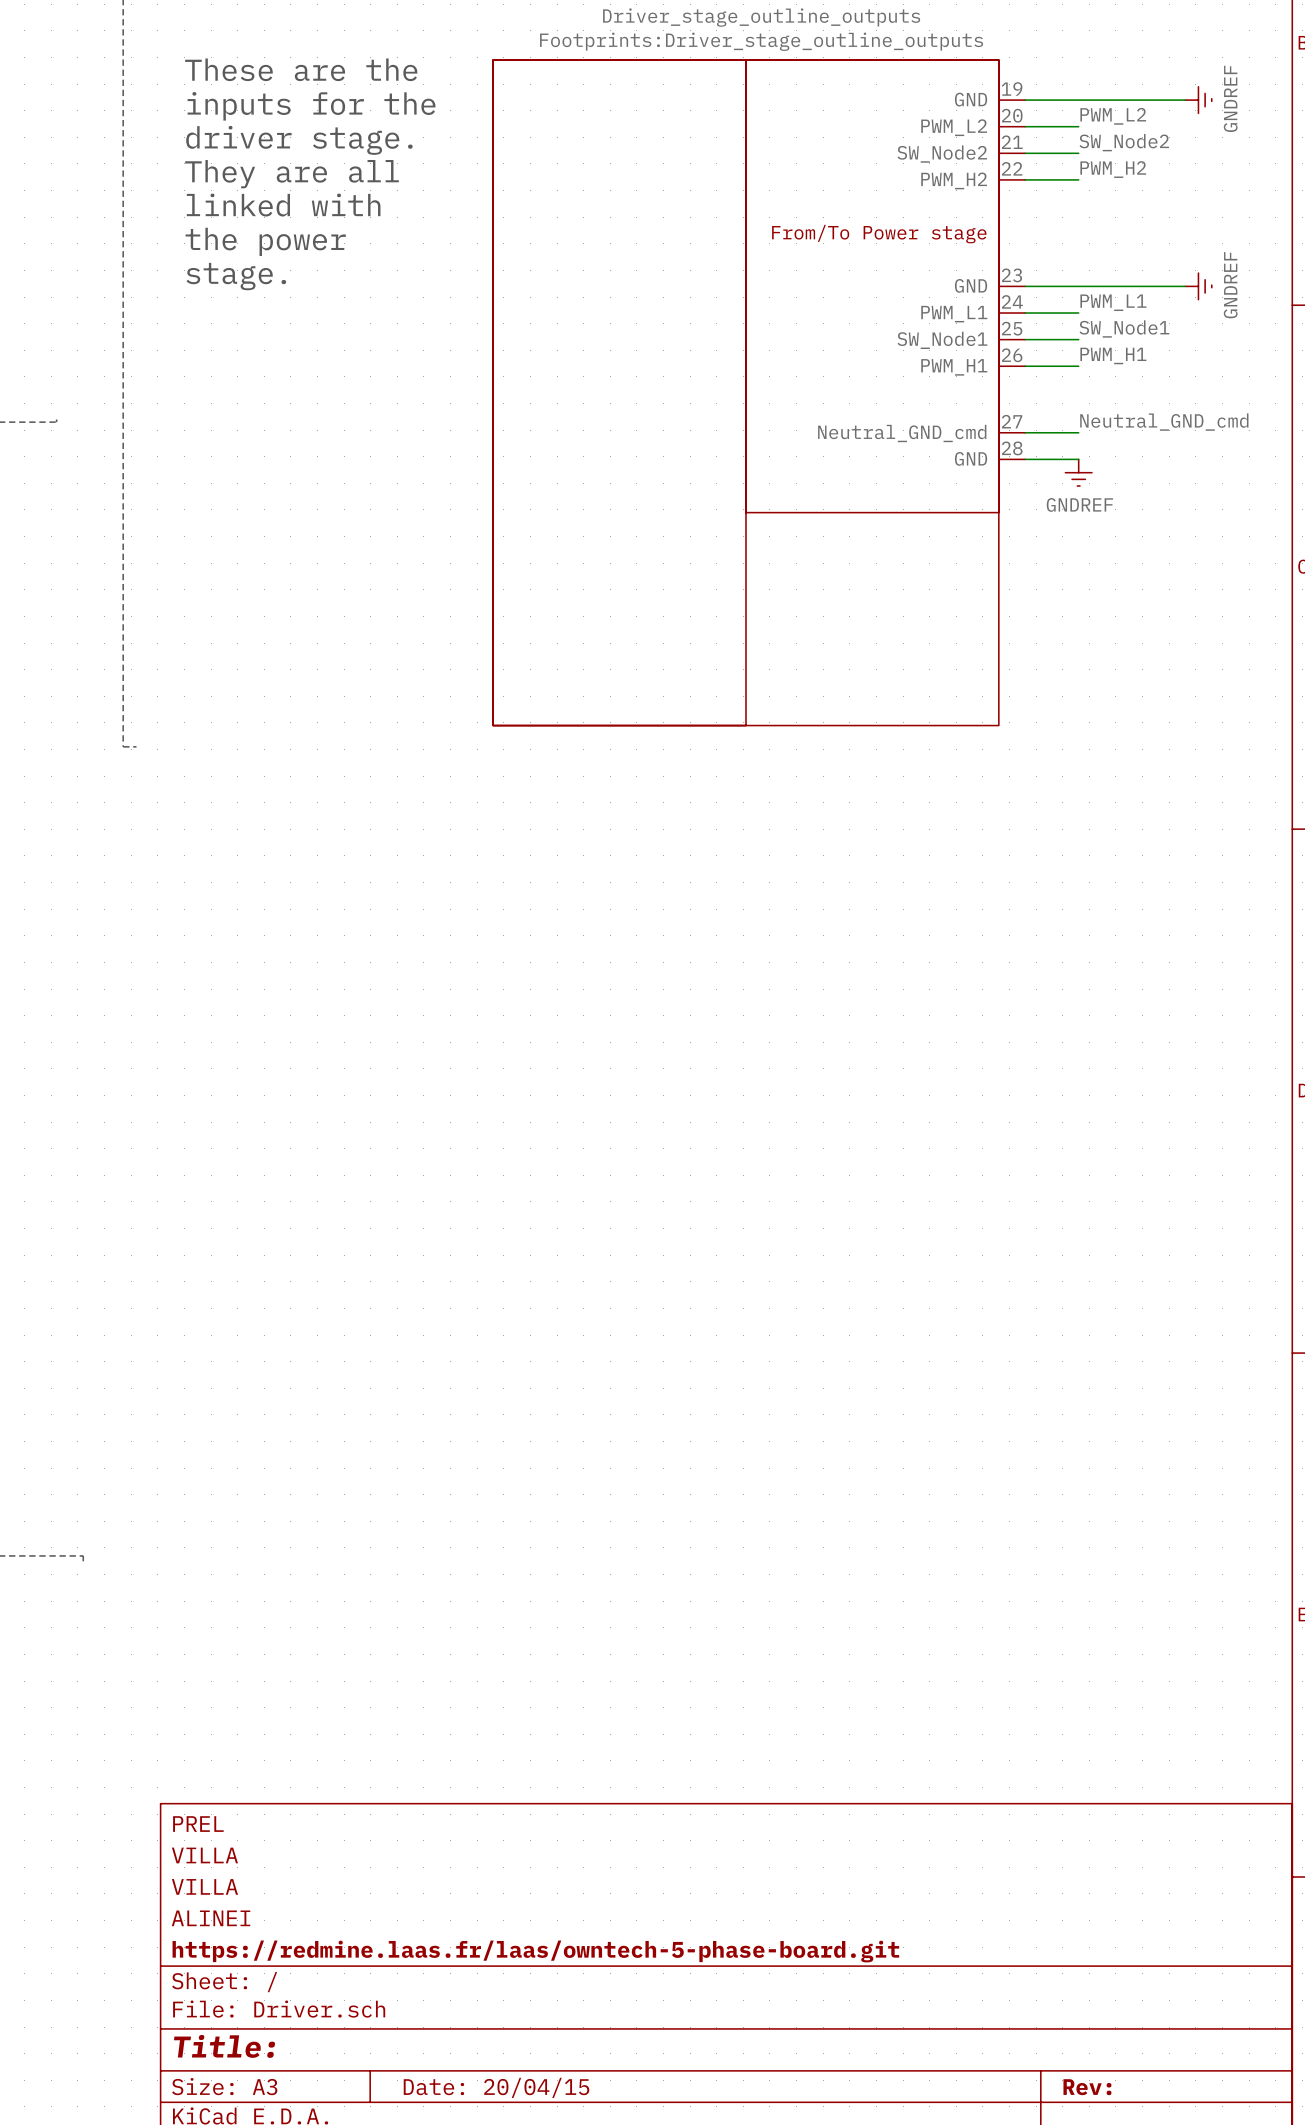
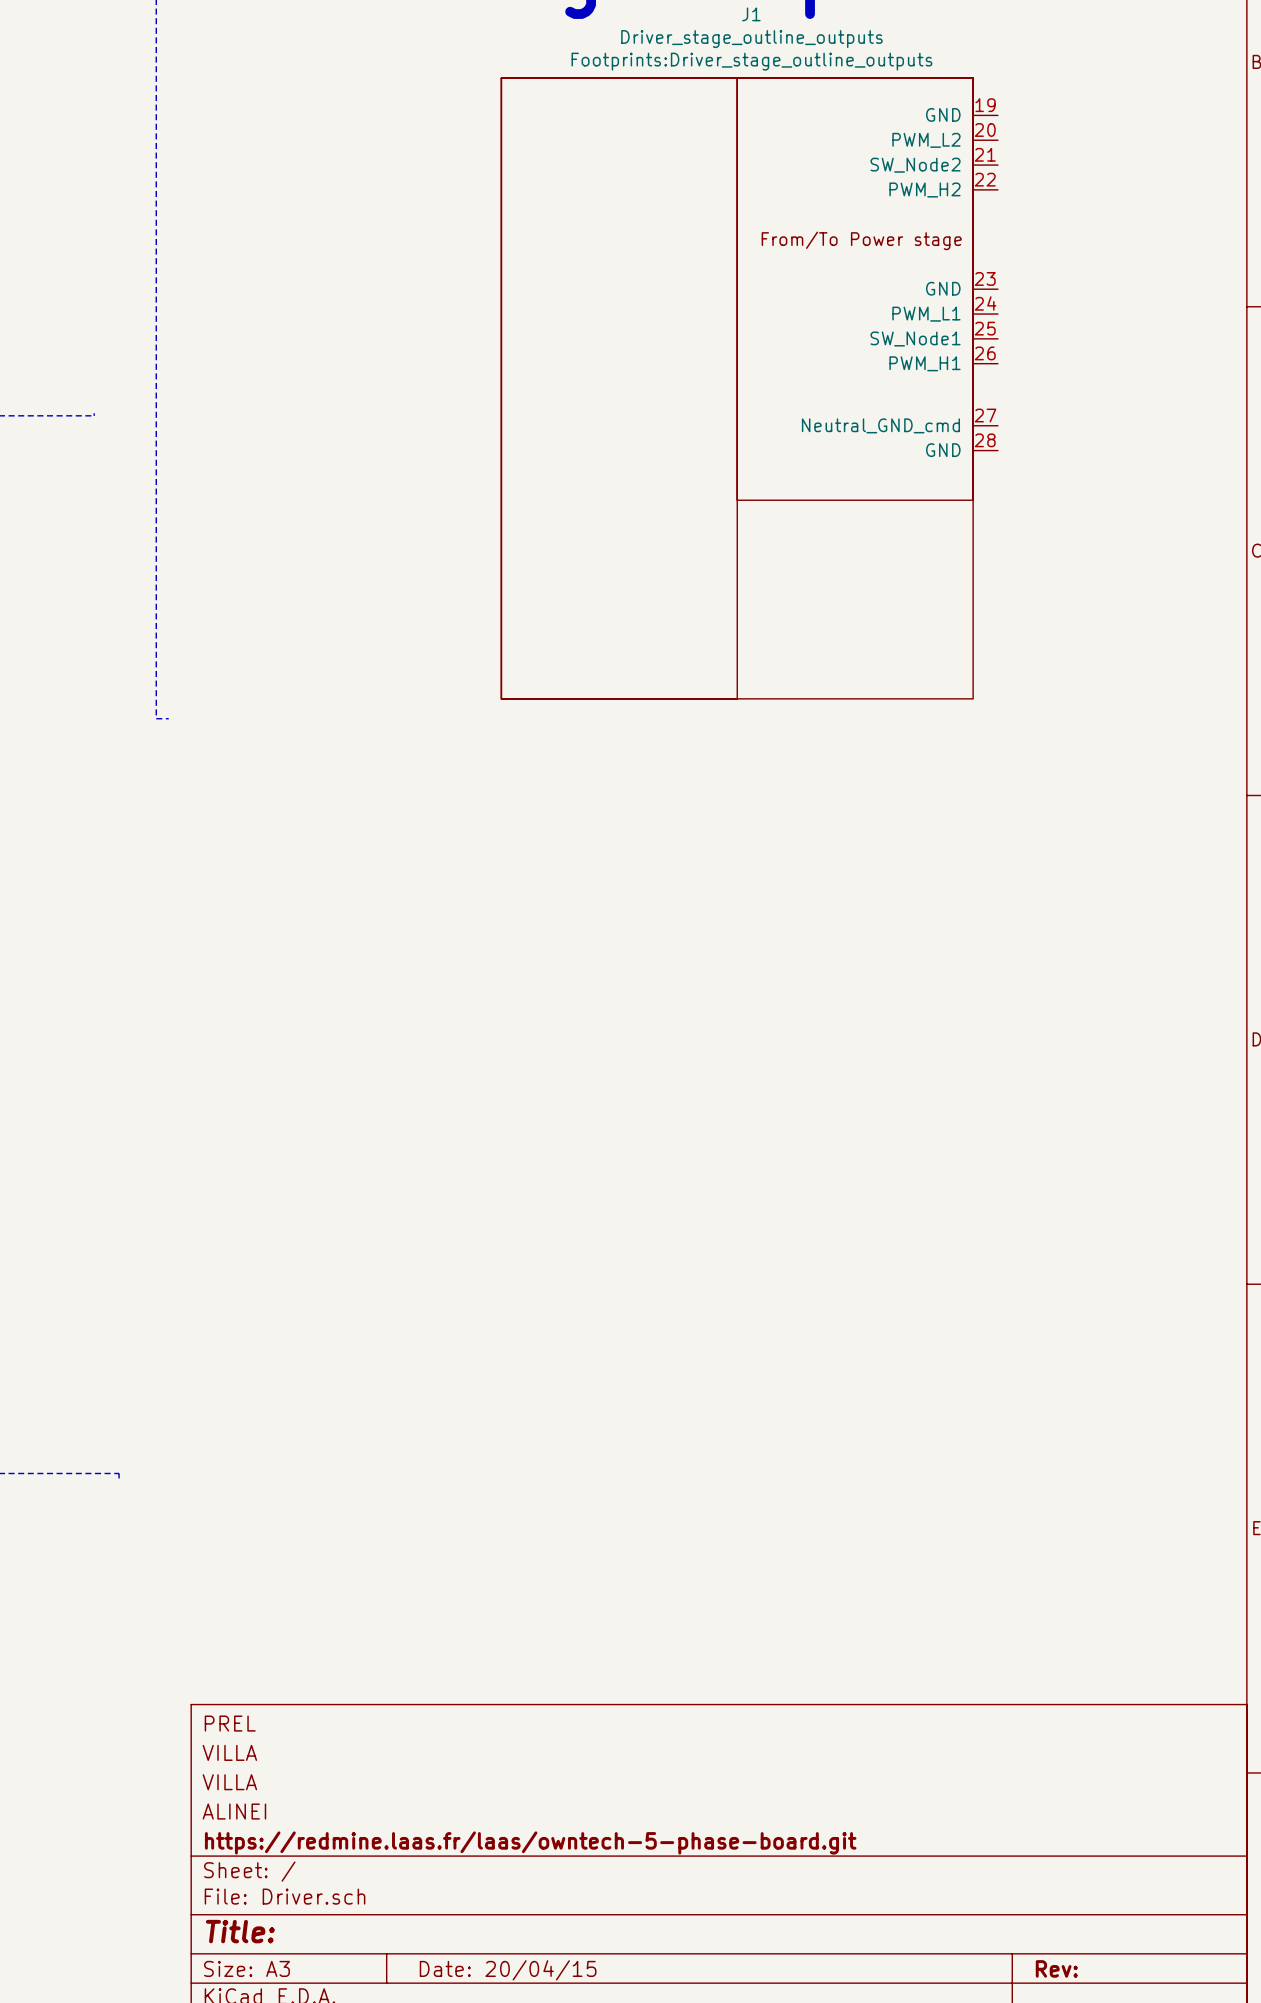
text: These are the (301, 69) -> none
wire: (1025, 100) (1185, 100) -> none
power symbol: GNDREF (1198, 100) -> none
text: inputs for the (311, 106) -> none
label: PWM_L2 (1113, 116) -> none
wire: (1025, 126) (1078, 126) -> none
text: driver stage. (299, 140) -> none
label: SW_Node2 (1124, 142) -> none
wire: (1025, 153) (1078, 153) -> none
label: PWM_H2 (1113, 169) -> none
text: They are all (292, 174) -> none
wire: (1025, 179) (1078, 179) -> none
text: linked with (283, 205) -> none
text: the power (265, 241) -> none
text: stage. (236, 276) -> none
wire: (1025, 286) (1185, 286) -> none
power symbol: GNDREF (1198, 286) -> none
label: PWM_L1 (1113, 302) -> none
wire: (1025, 313) (1078, 313) -> none
label: SW_Node1 (1124, 328) -> none
wire: (1025, 339) (1078, 339) -> none
label: PWM_H1 (1113, 355) -> none
wire: (1025, 366) (1078, 366) -> none
label: Neutral_GND_cmd (1164, 422) -> none
wire: (1025, 432) (1078, 432) -> none
wire: (1025, 459) (1078, 459) -> none
power symbol: GNDREF (1078, 472) -> none

